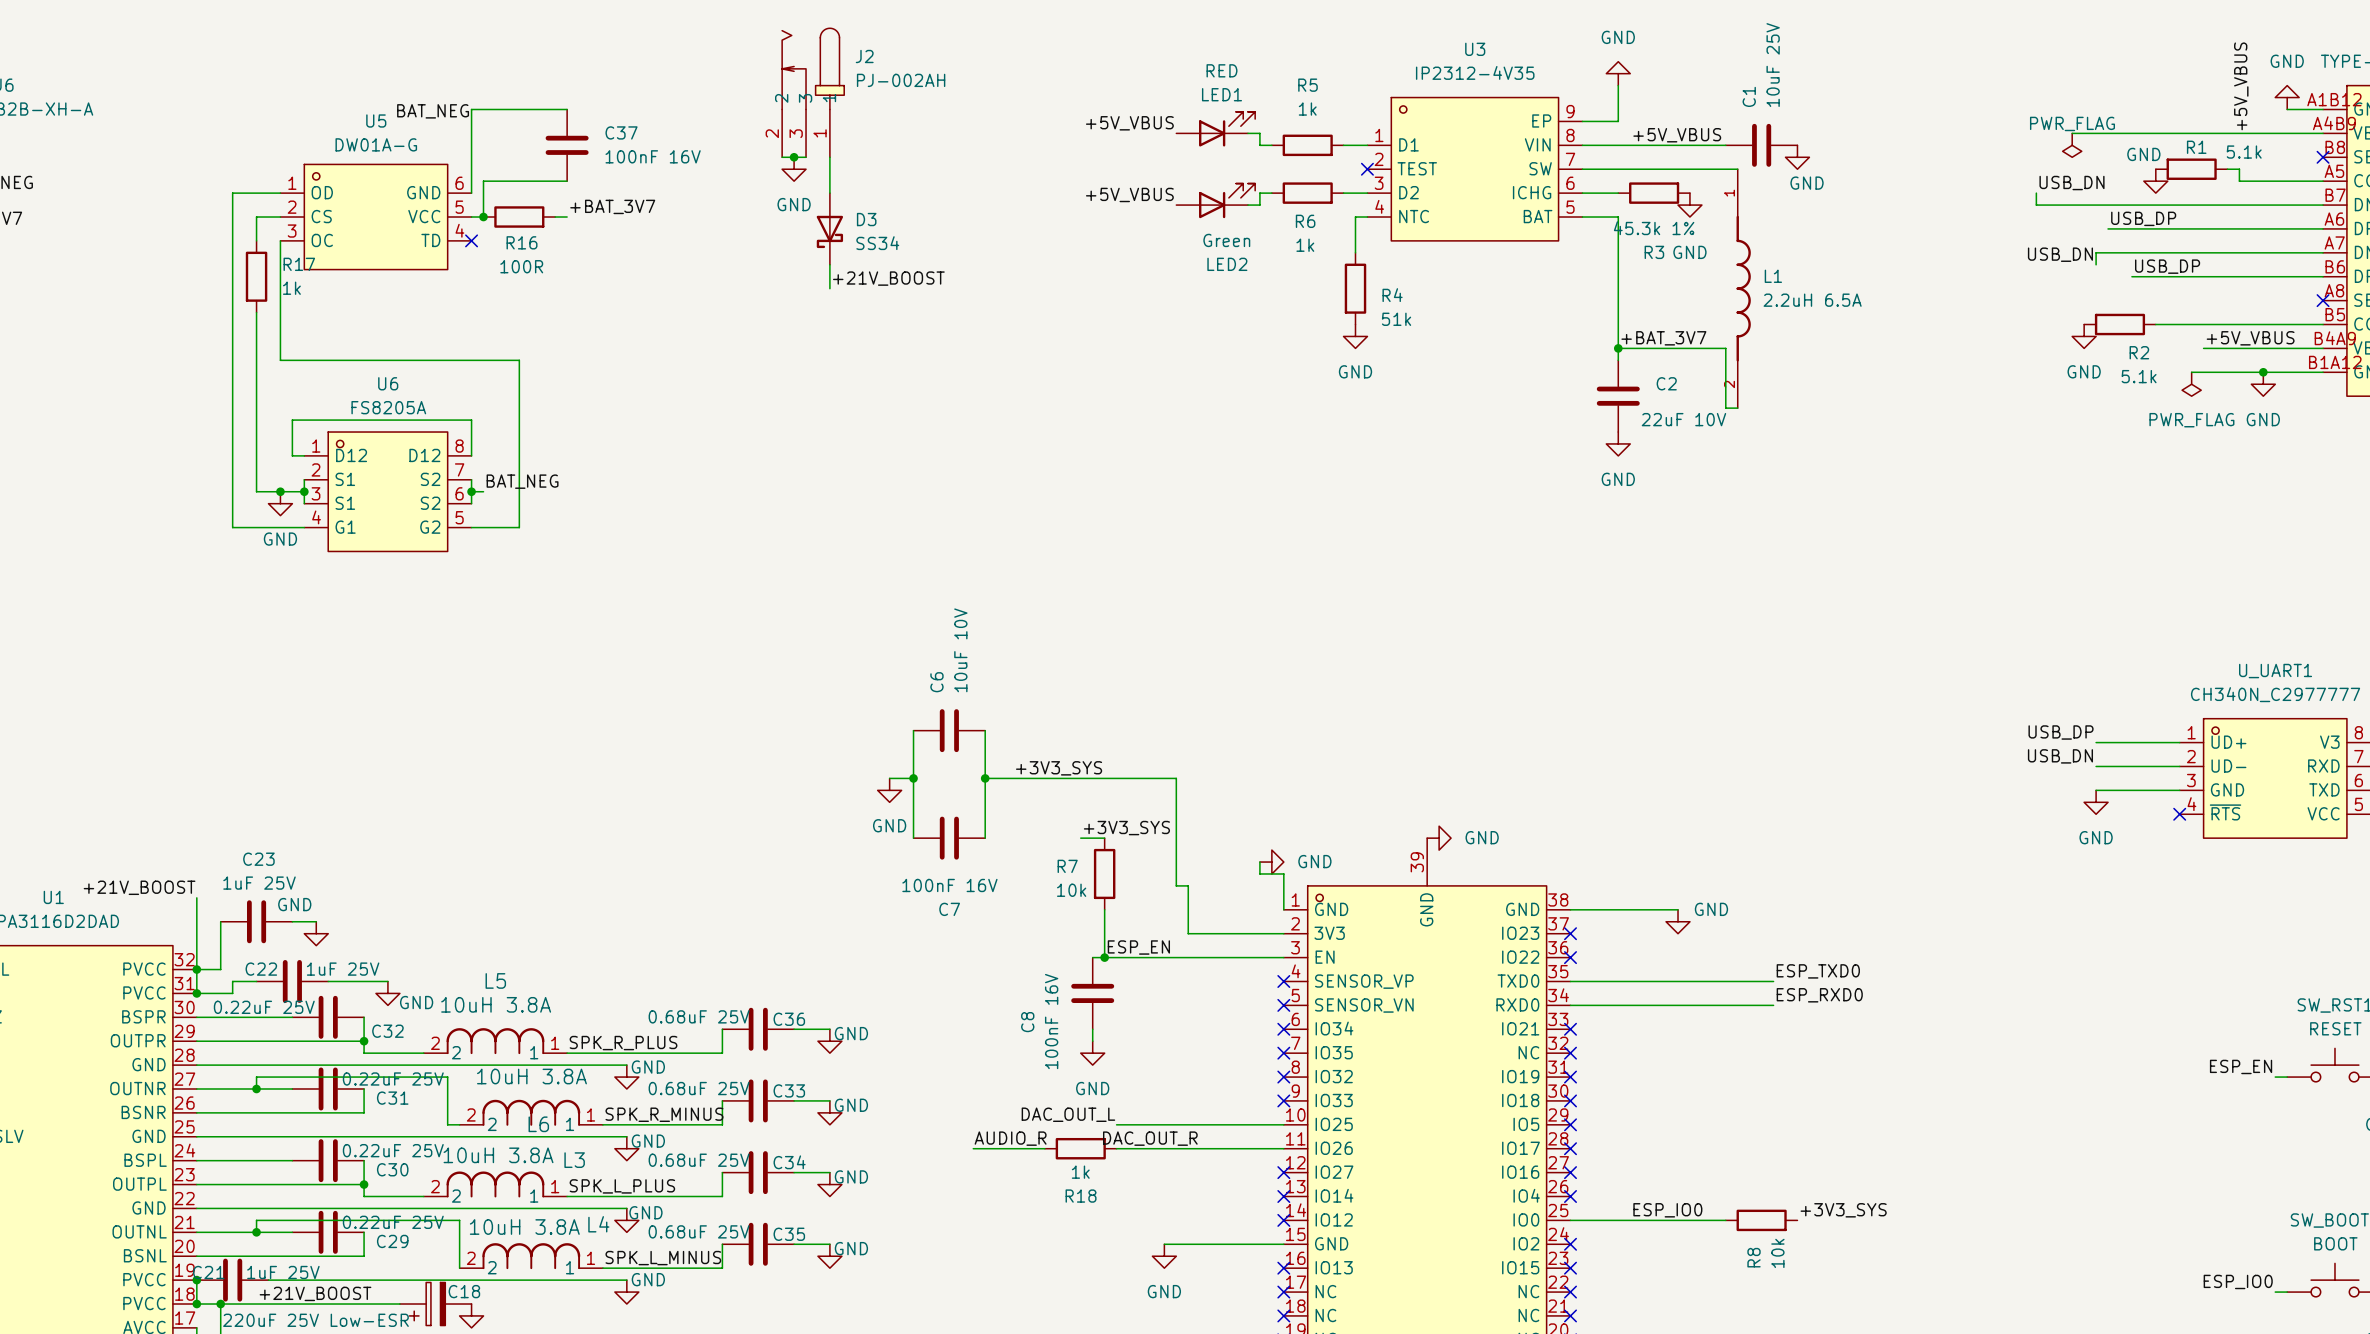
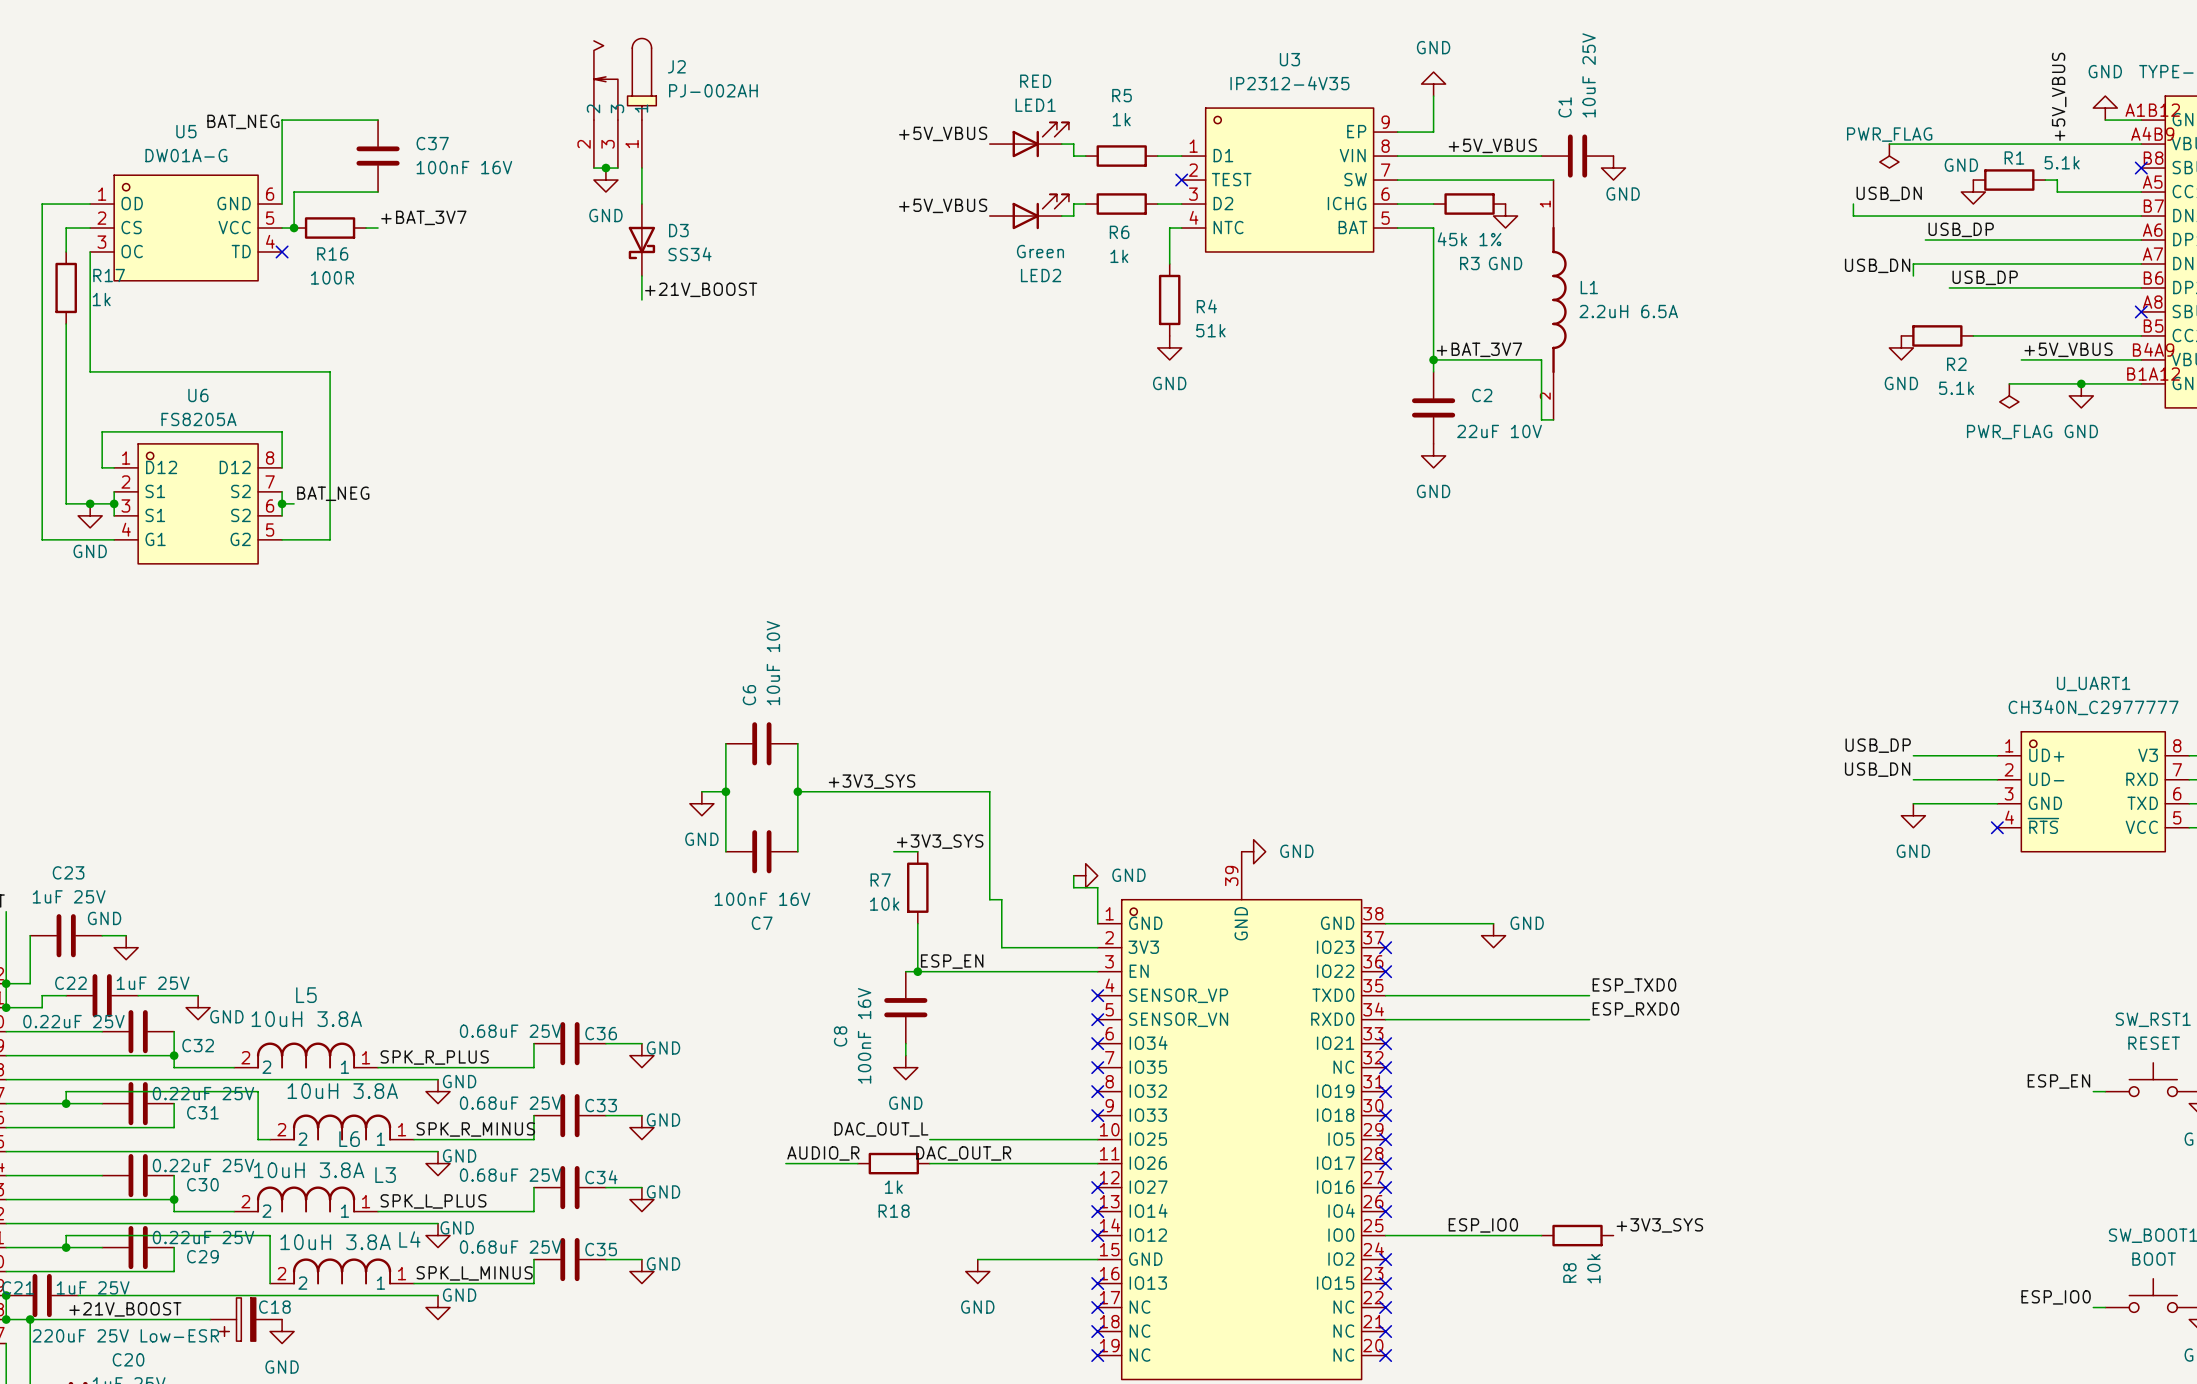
R3 value: 45.3k 1% (1654, 228) -> 45k 1% (1469, 239)

